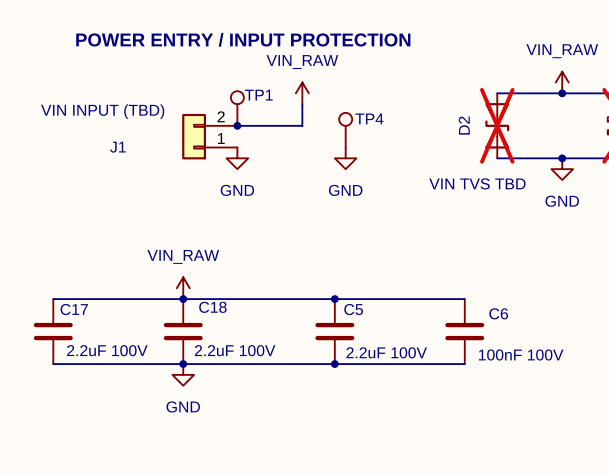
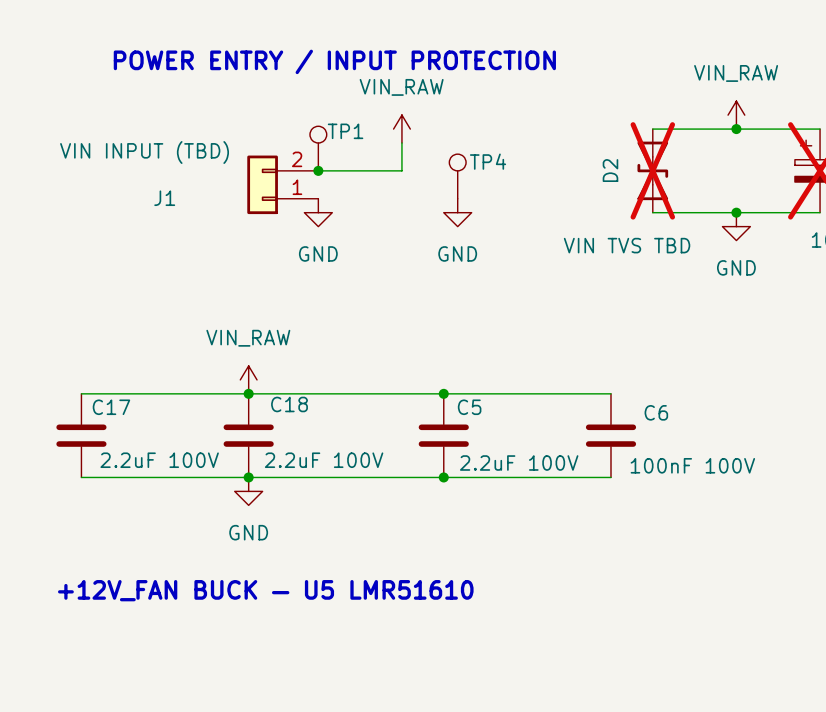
text: none -> +12V_FAN BUCK — U5 LMR51610 (265, 590)

